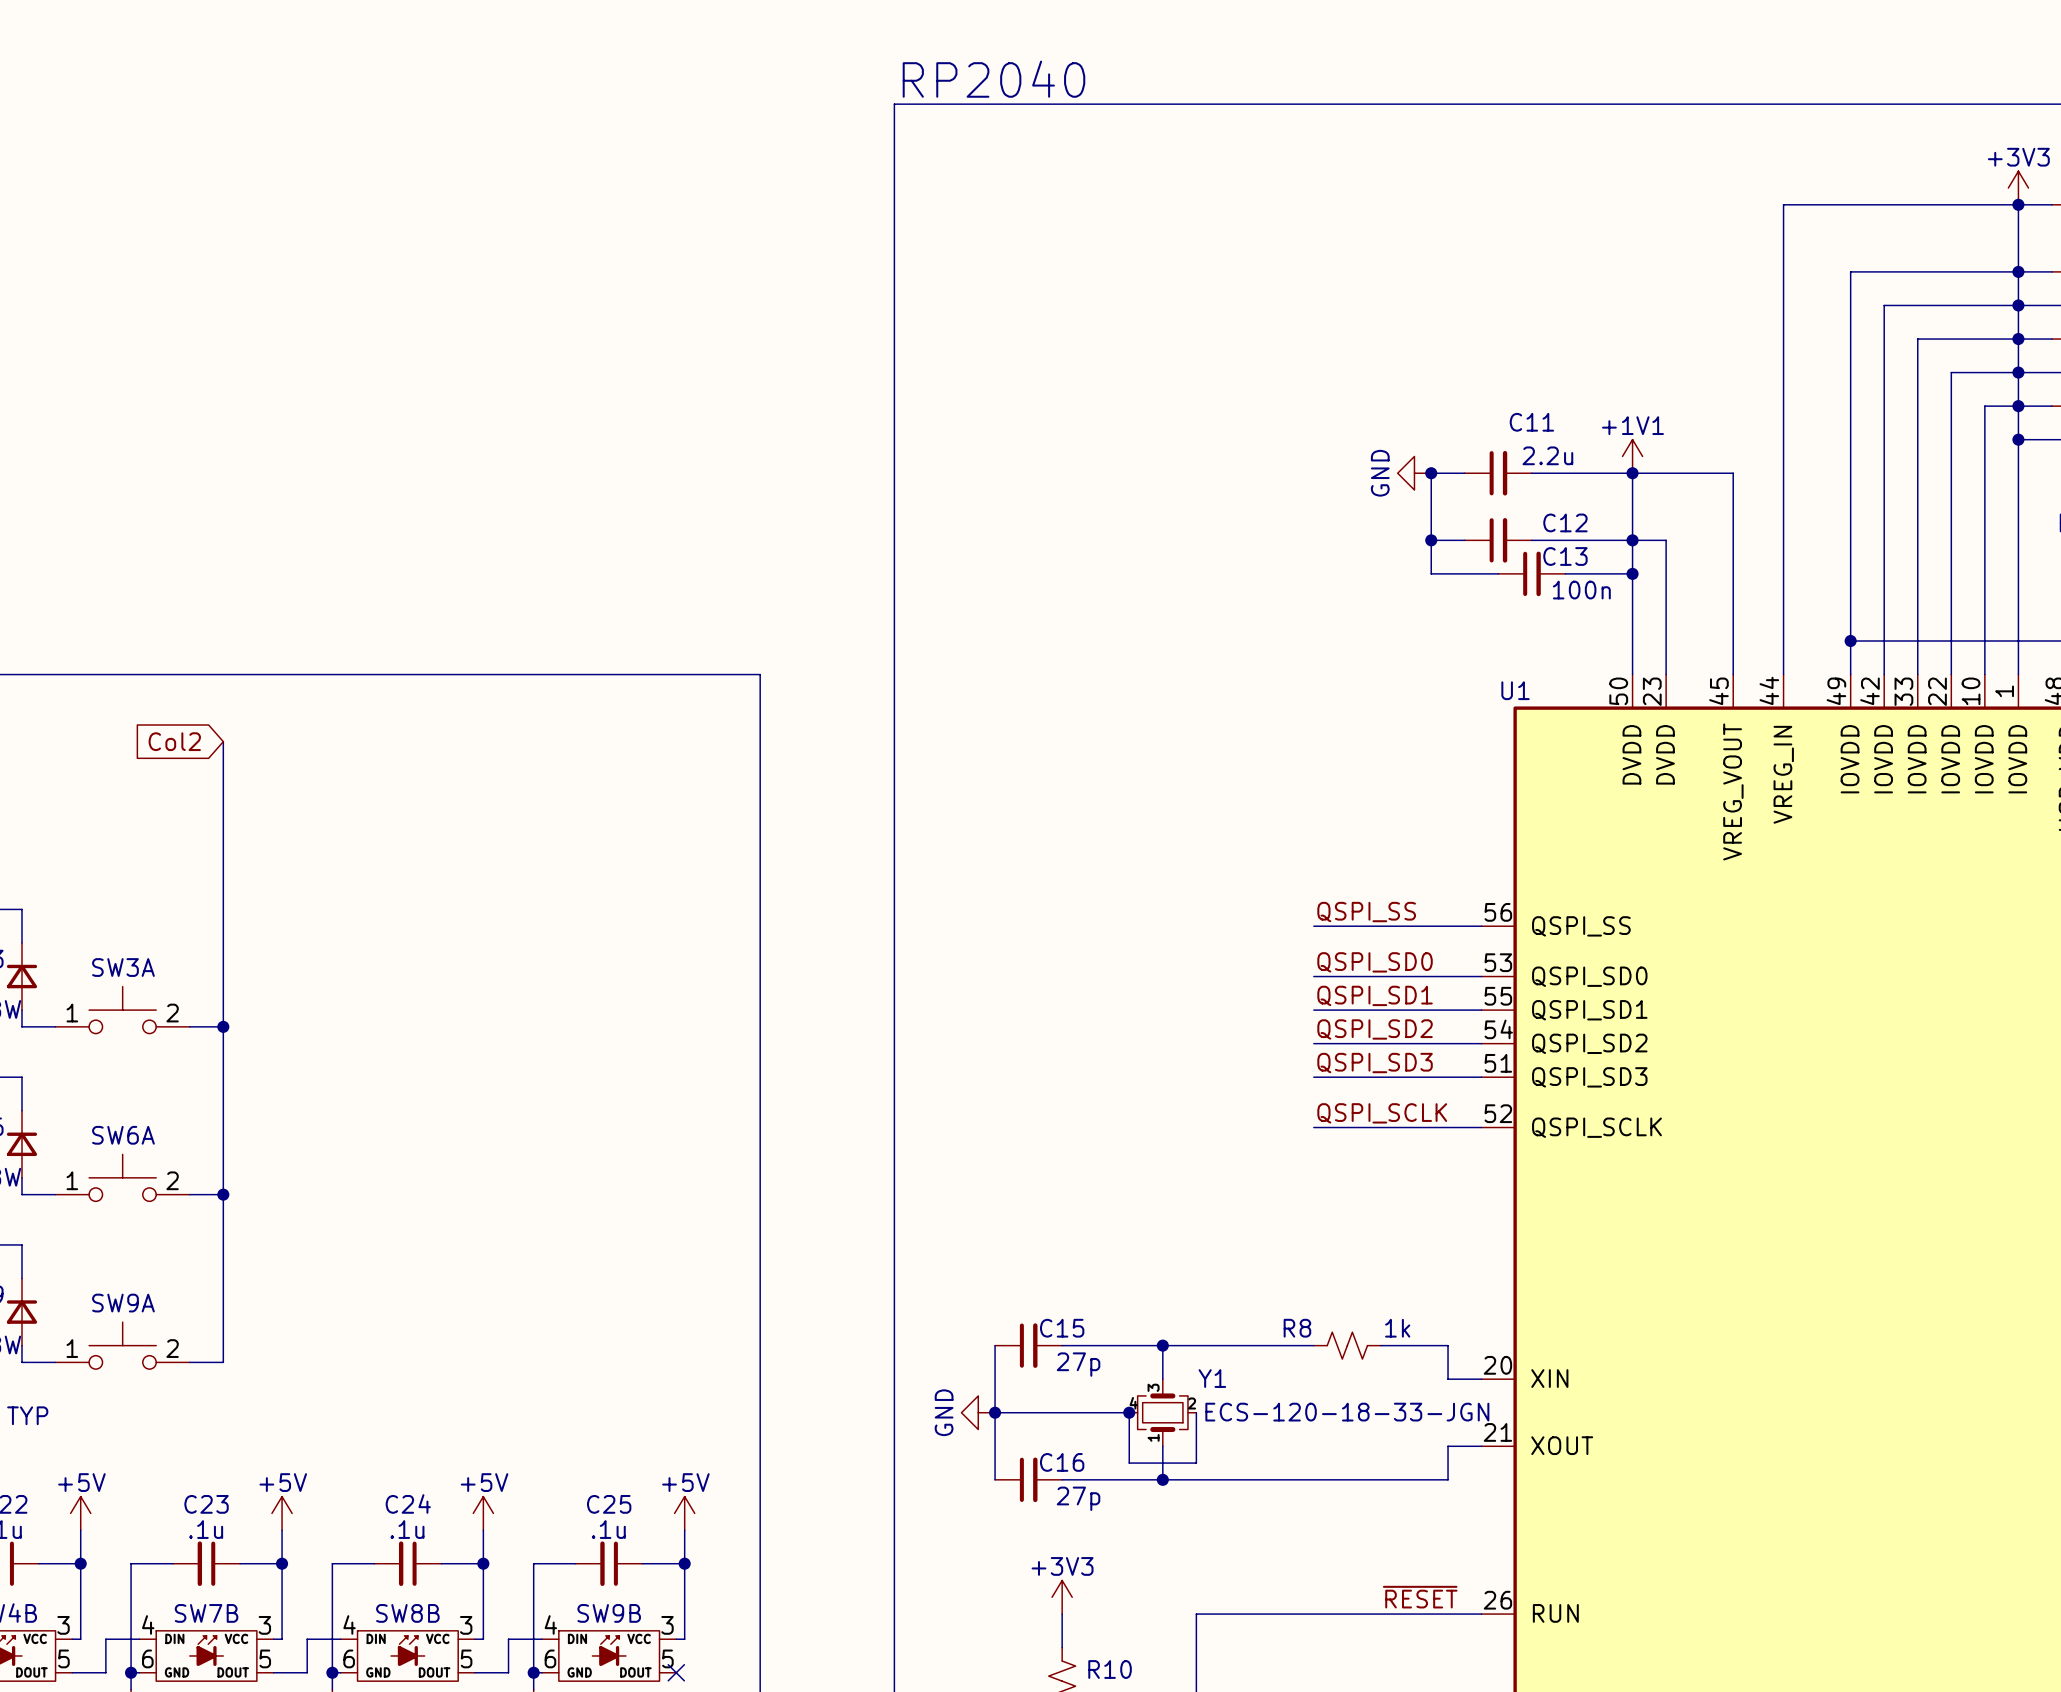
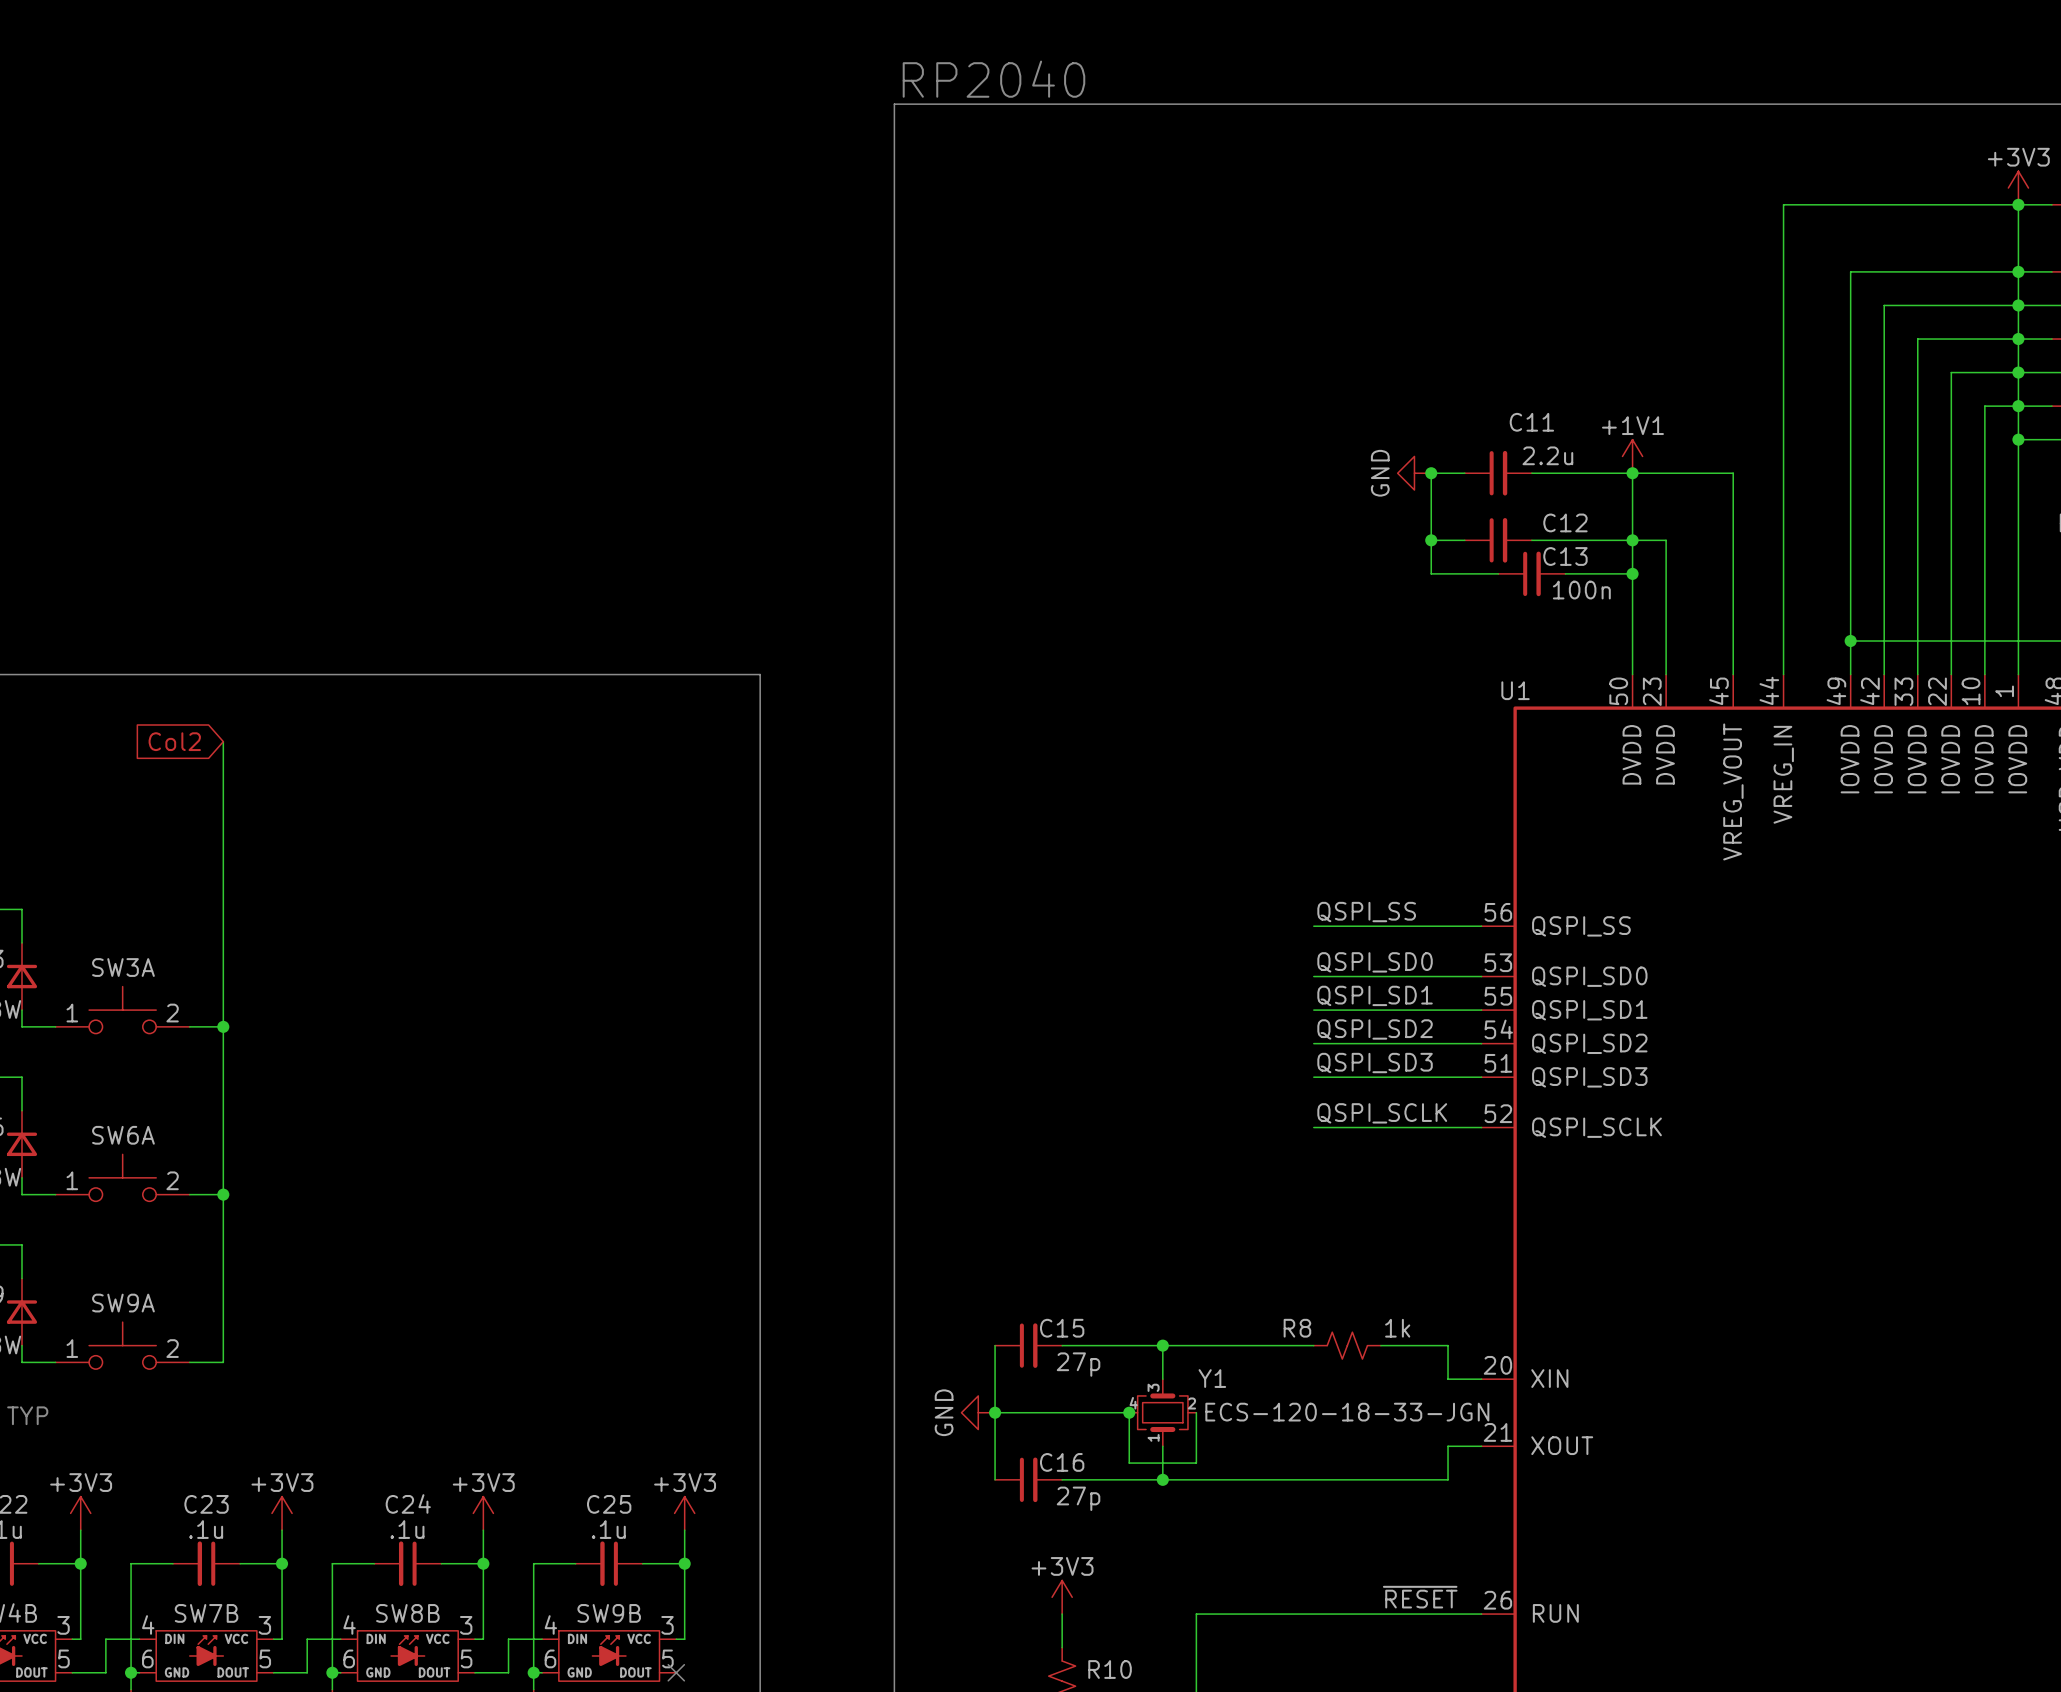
power symbol: +5V (80, 1513) -> +3V3 (80, 1513)
power symbol: +5V (282, 1513) -> +3V3 (282, 1513)
power symbol: +5V (483, 1513) -> +3V3 (483, 1513)
power symbol: +5V (684, 1513) -> +3V3 (684, 1513)

